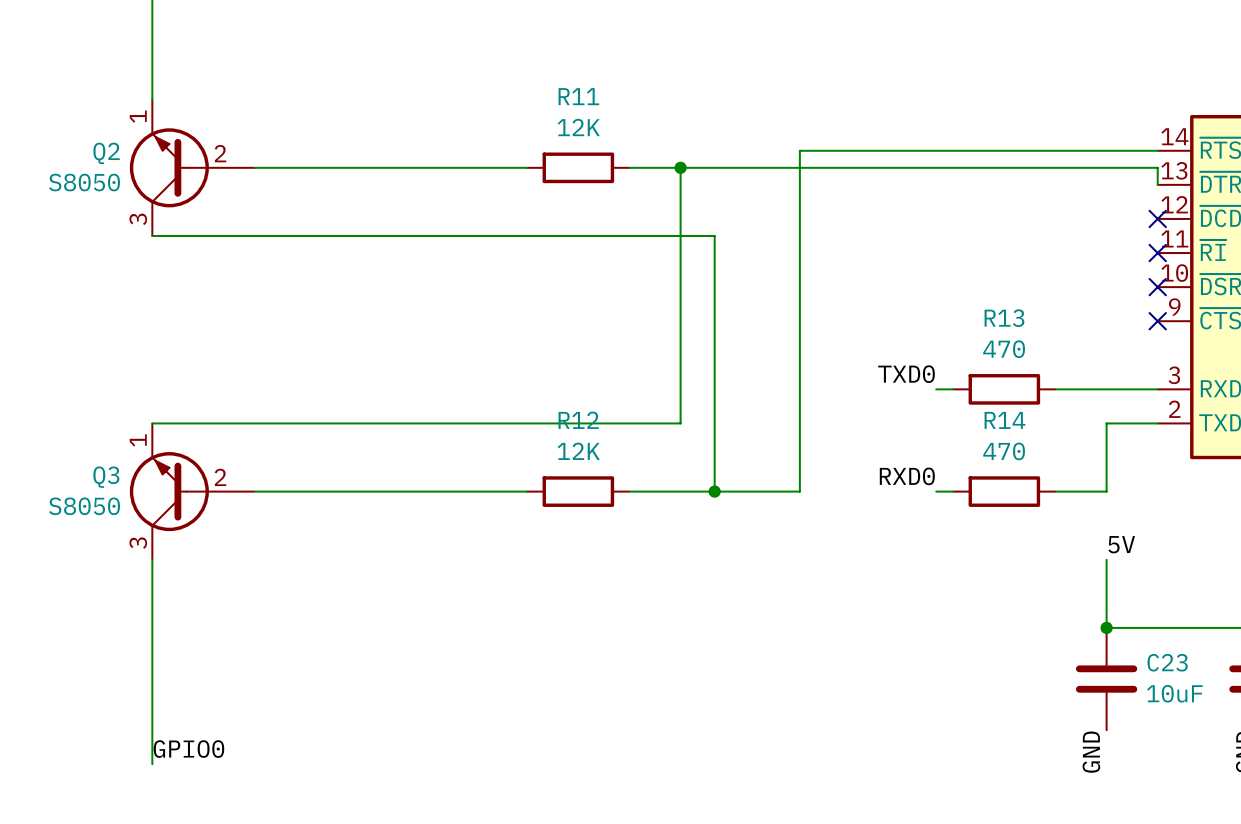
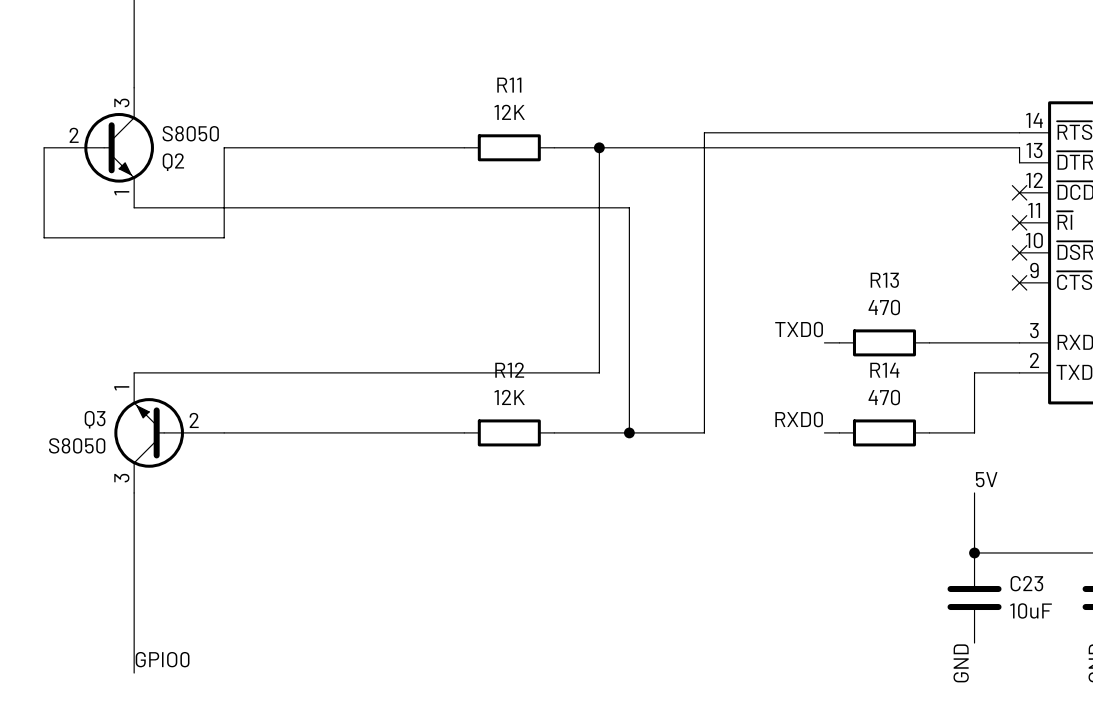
wire: none -> (44, 147) (44, 237) (224, 237) (224, 147)
Q2 rotation: 0° (169, 167) -> 180° (119, 147)

